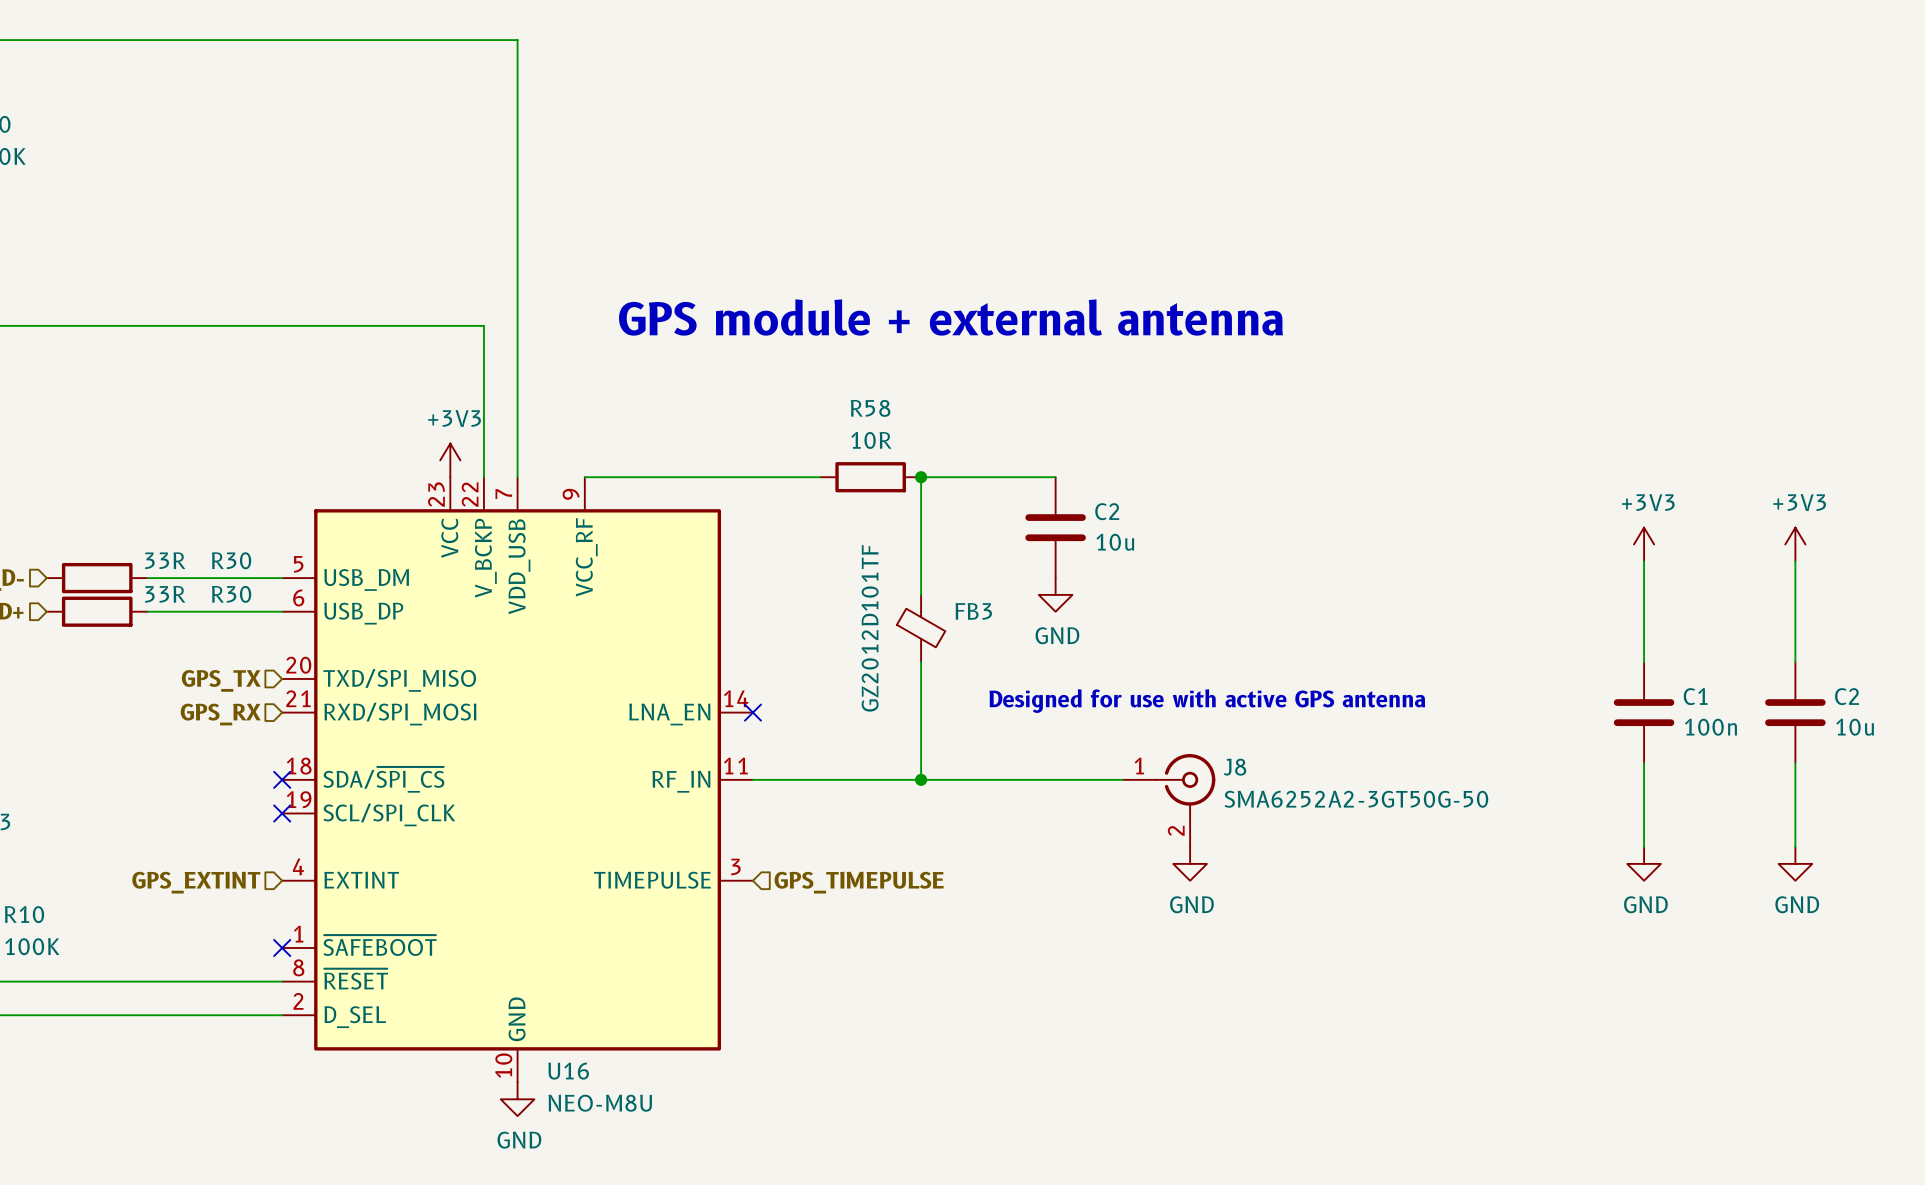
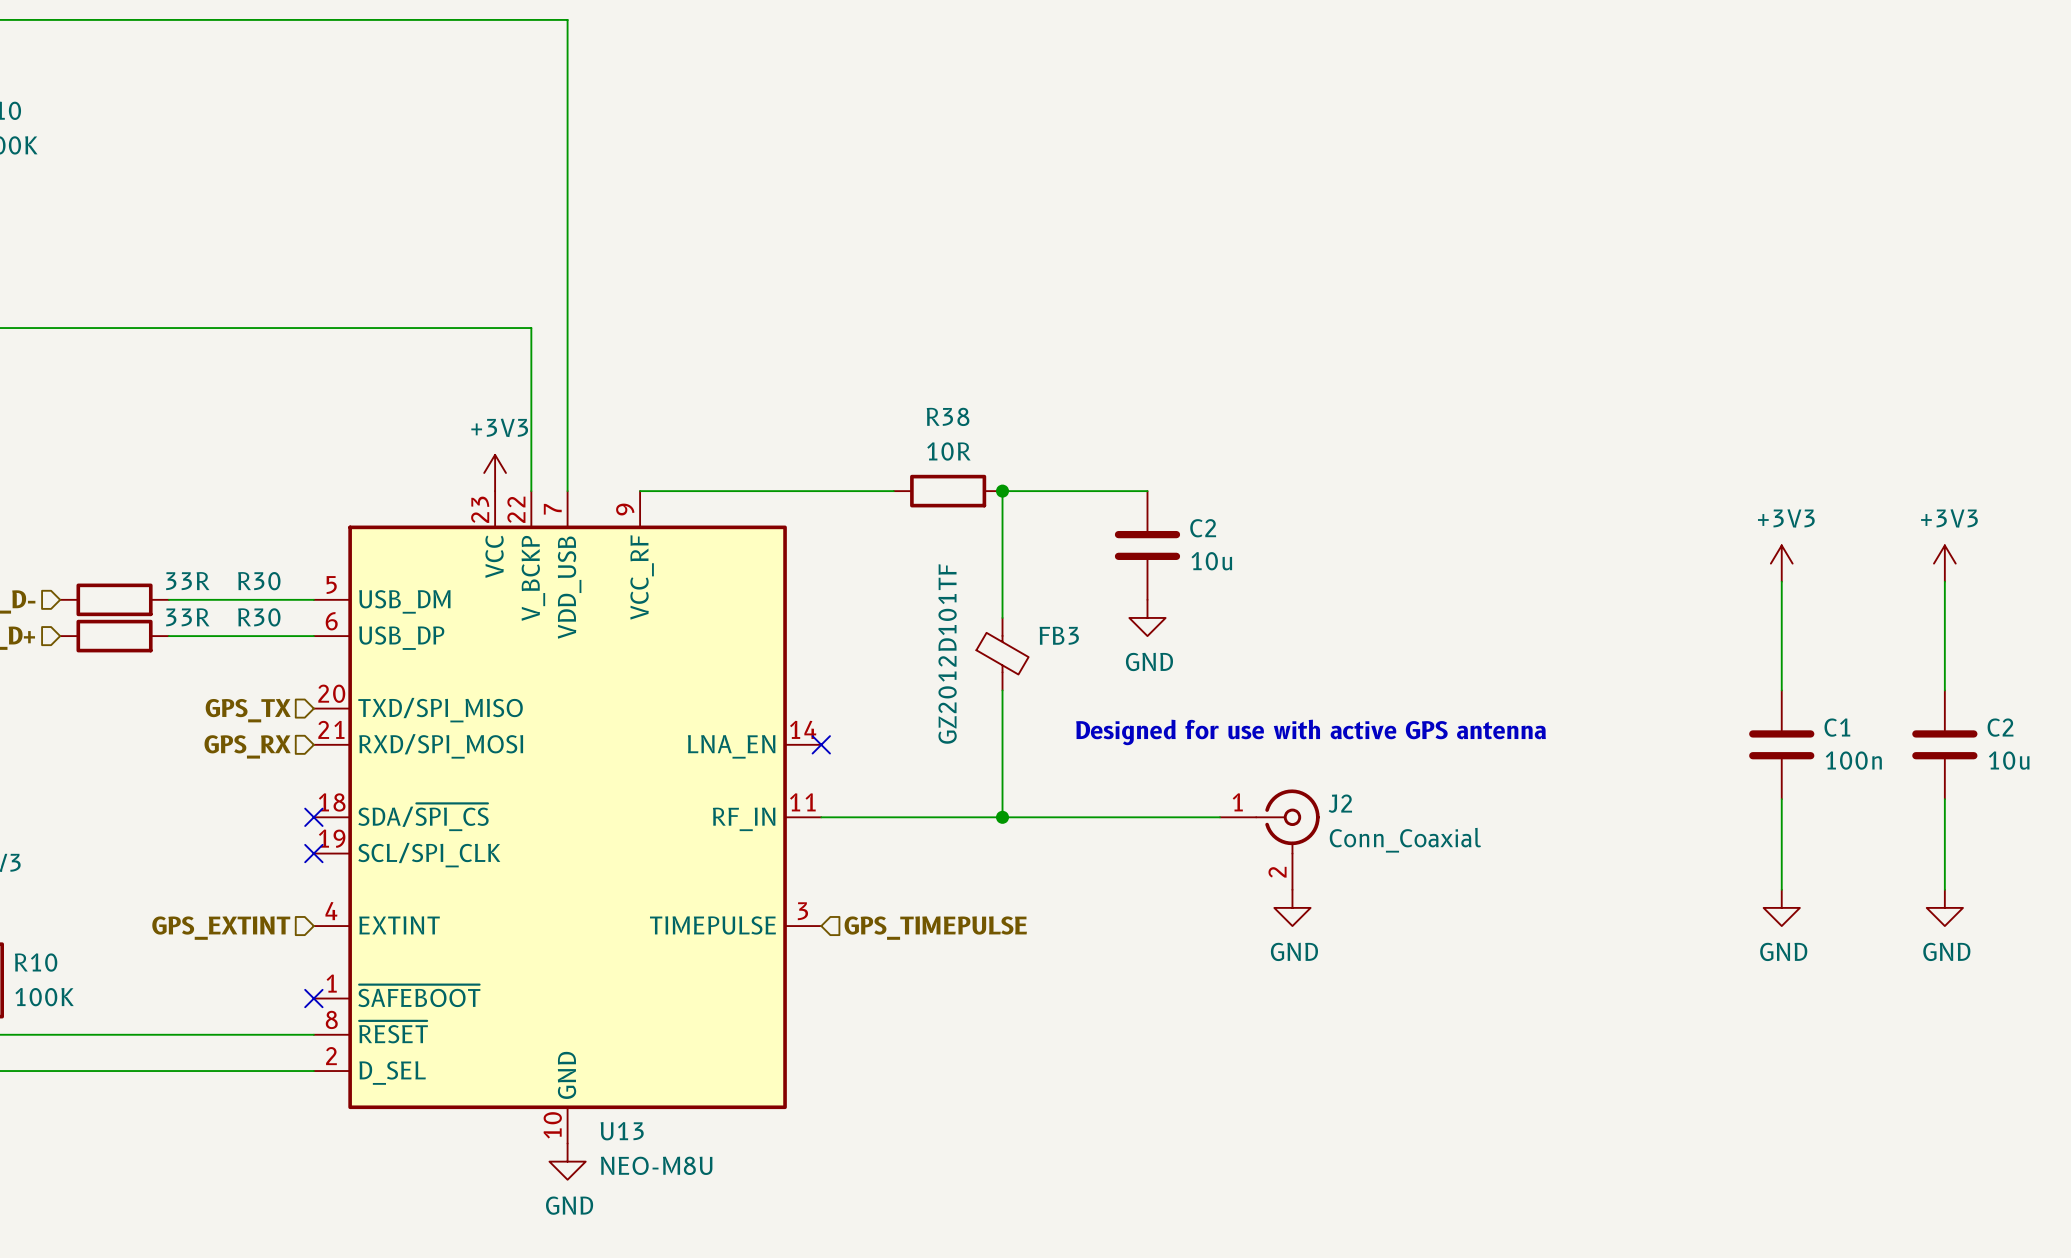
text: GPS module + external antenna (950, 317) -> none
R58 name: R58 (870, 408) -> R38 (948, 416)
J8 name: J8 (1234, 767) -> J2 (1340, 803)
J8 value: SMA6252A2-3GT50G-50 (1356, 799) -> Conn_Coaxial (1405, 840)
U16 name: U16 (568, 1071) -> U13 (622, 1131)

